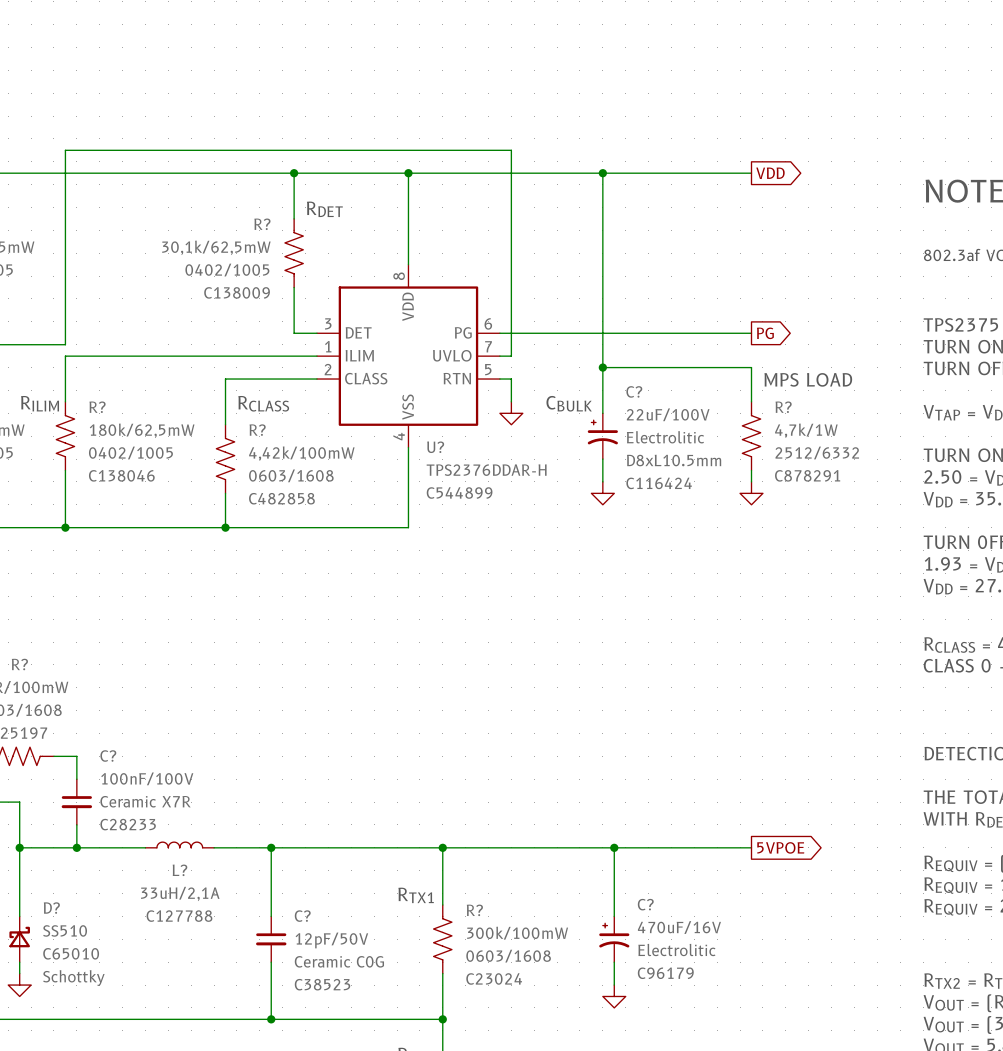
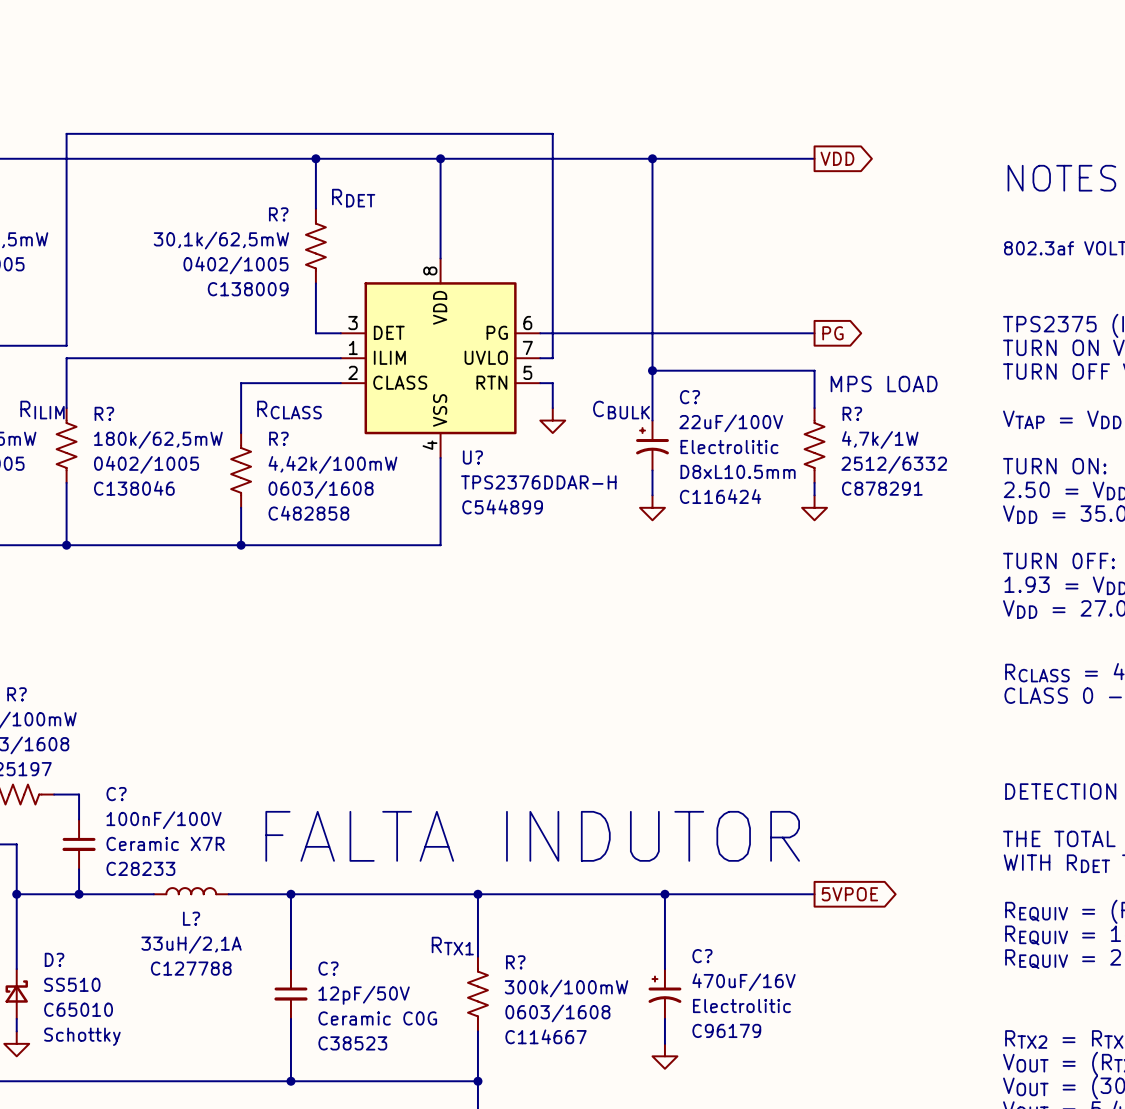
text: none -> FALTA INDUTOR (532, 836)
R? text: C23024 (494, 978) -> C114667 (546, 1036)

